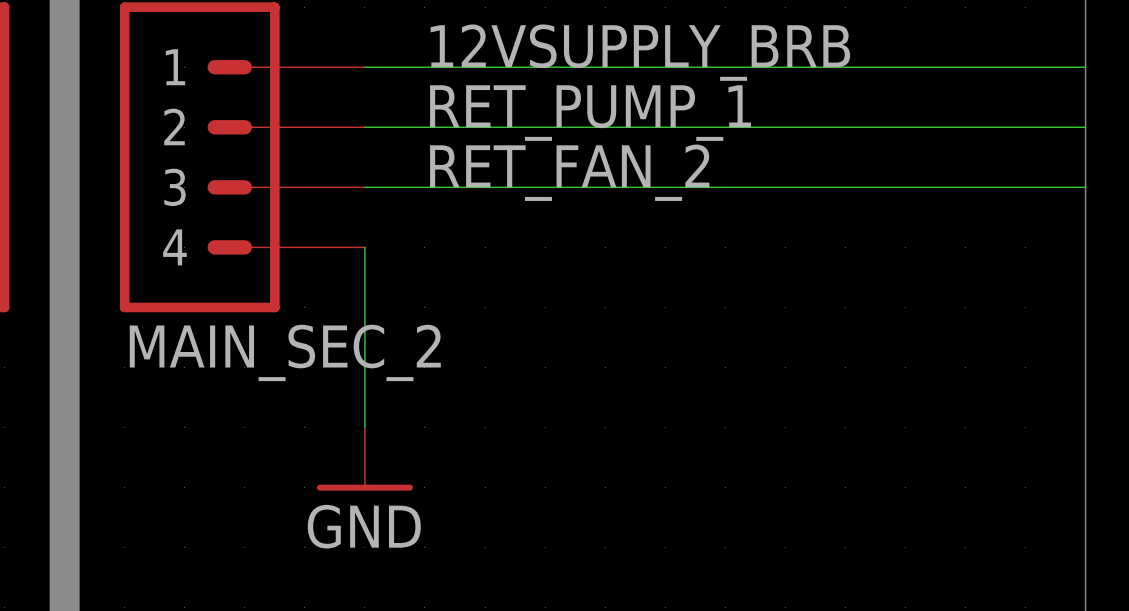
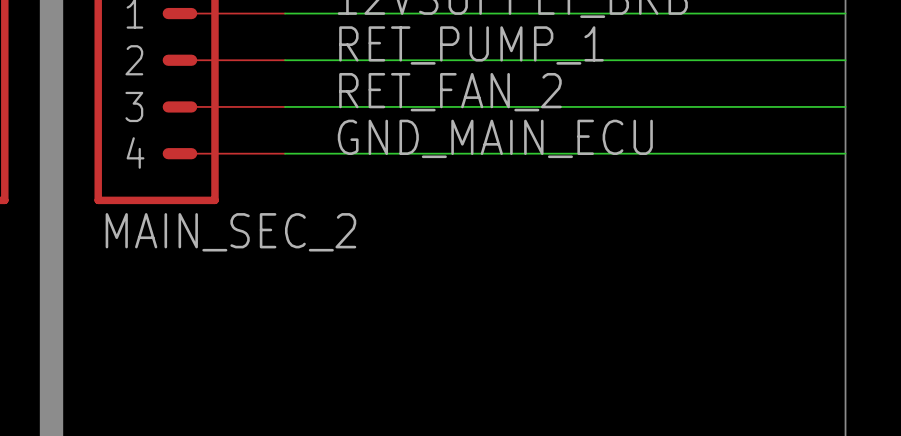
label: none -> GND_MAIN_ECU (495, 138)
wire: (364, 247) (364, 427) -> (285, 153) (845, 153)
power symbol: GND (364, 459) -> none

